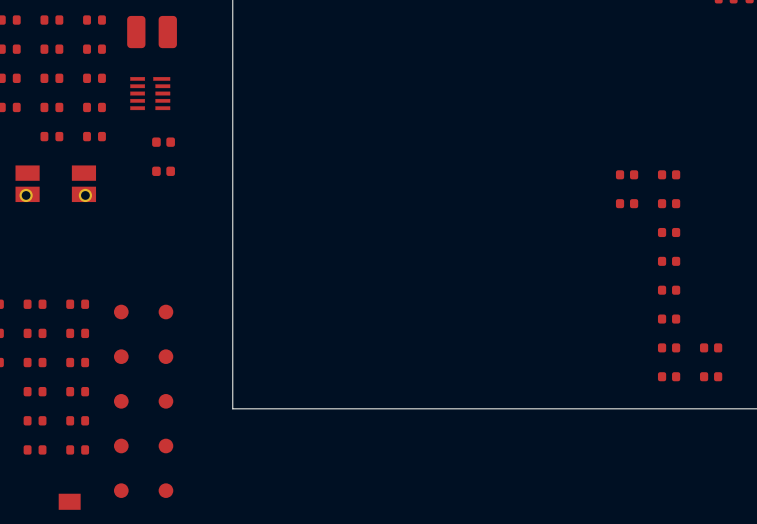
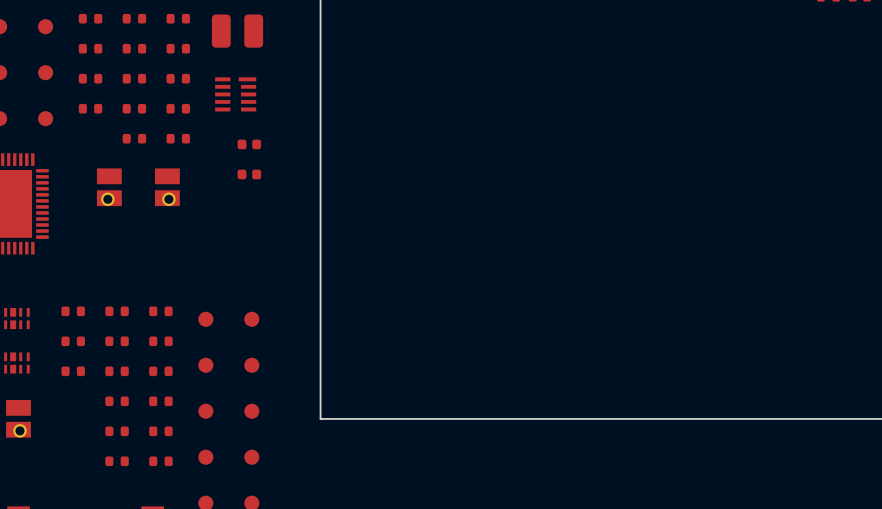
part: (627, 174) -> none
part: (669, 174) -> none
part: (627, 203) -> none
part: (669, 203) -> none
part: (669, 232) -> none
part: (669, 261) -> none
part: (669, 290) -> none
part: (669, 319) -> none
part: (669, 347) -> none
part: (711, 347) -> none
part: (669, 376) -> none
part: (711, 376) -> none

